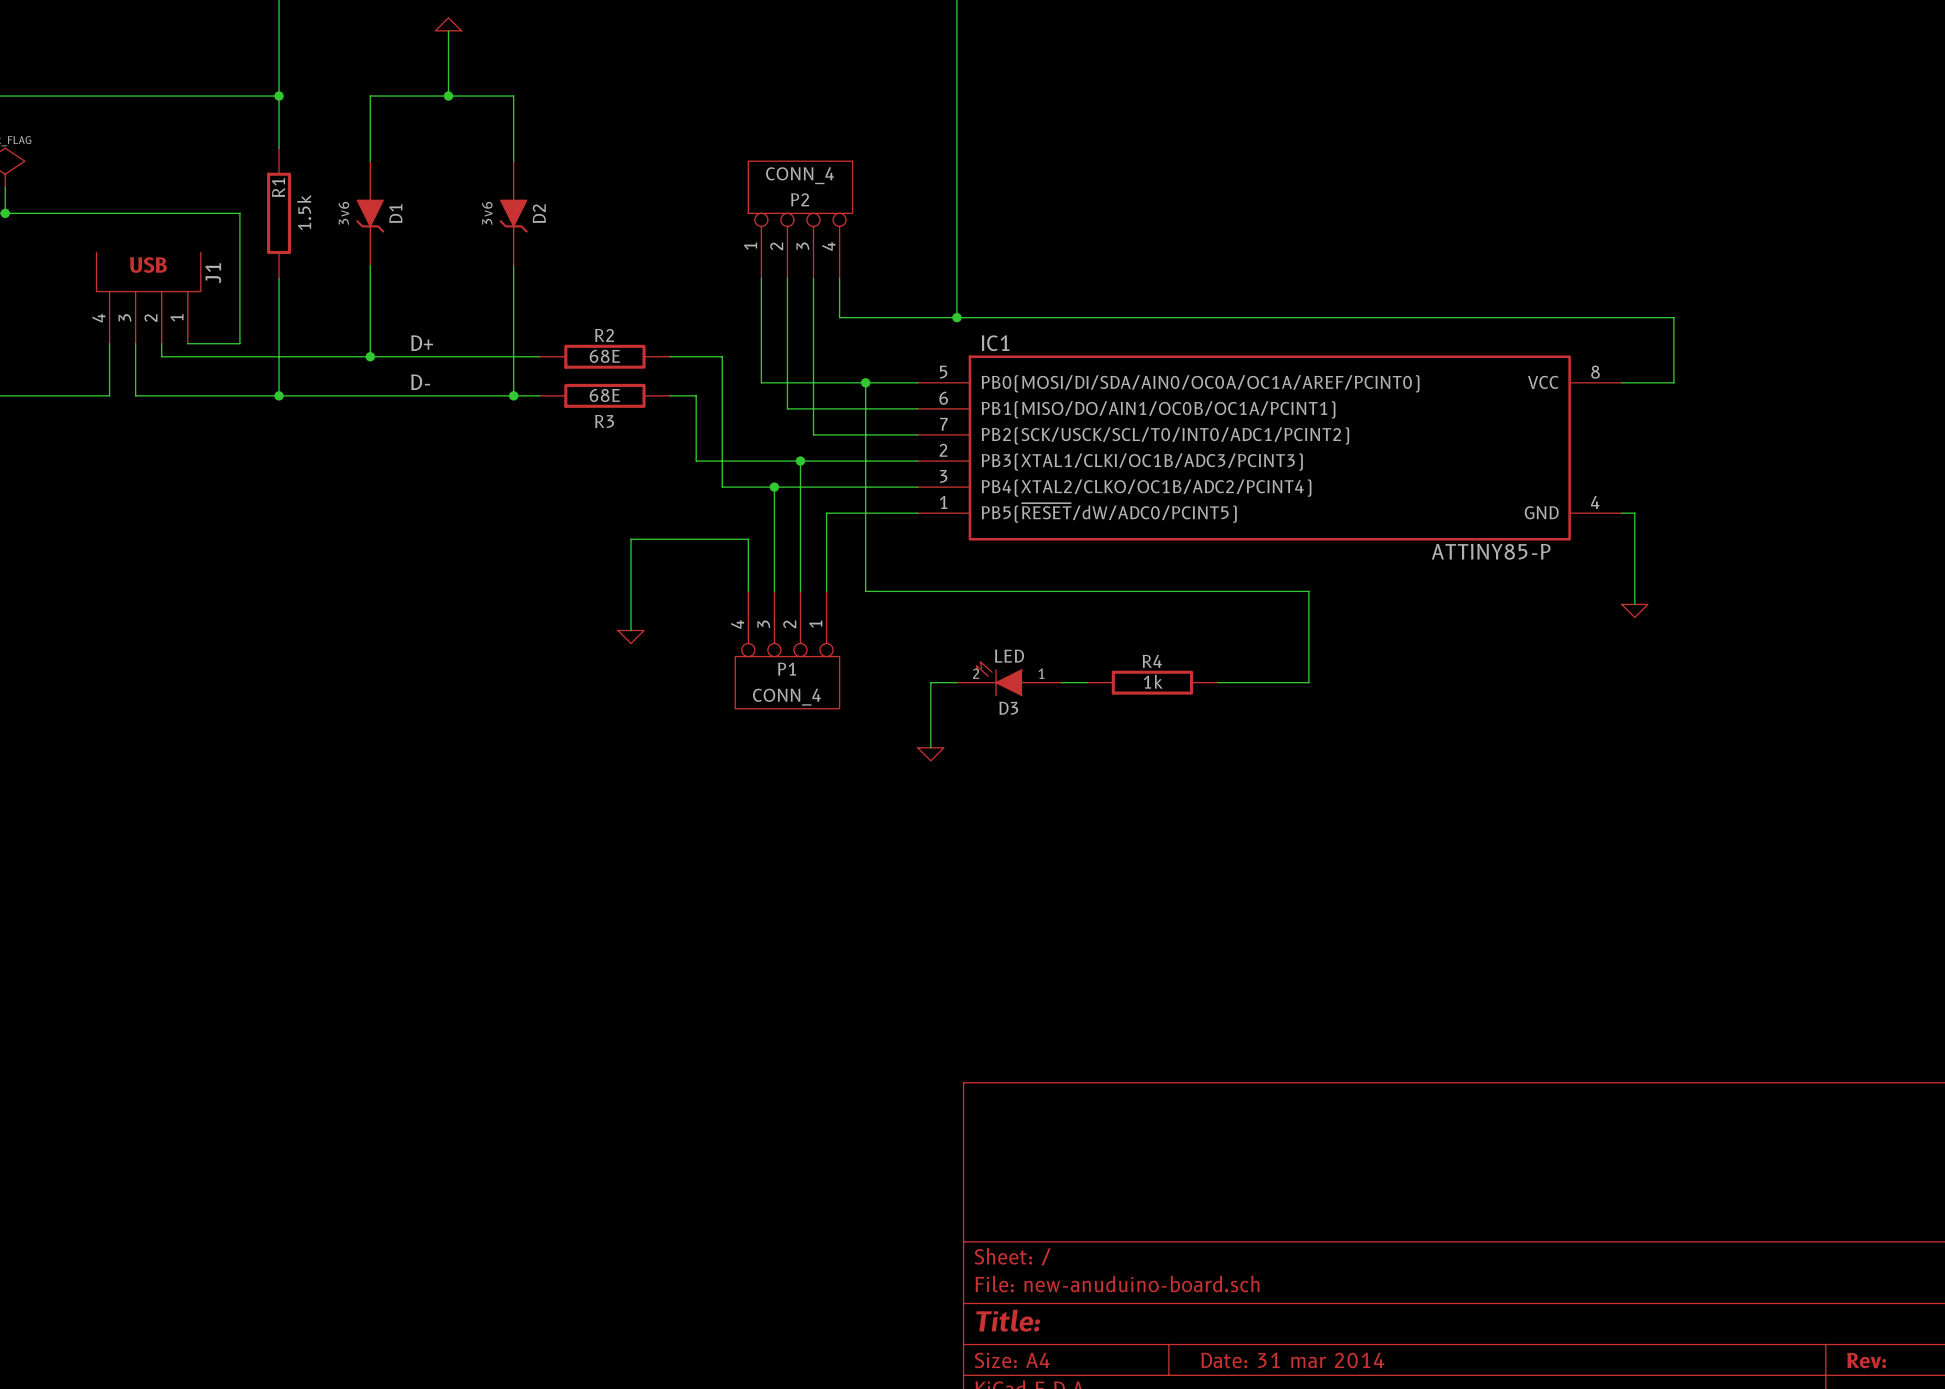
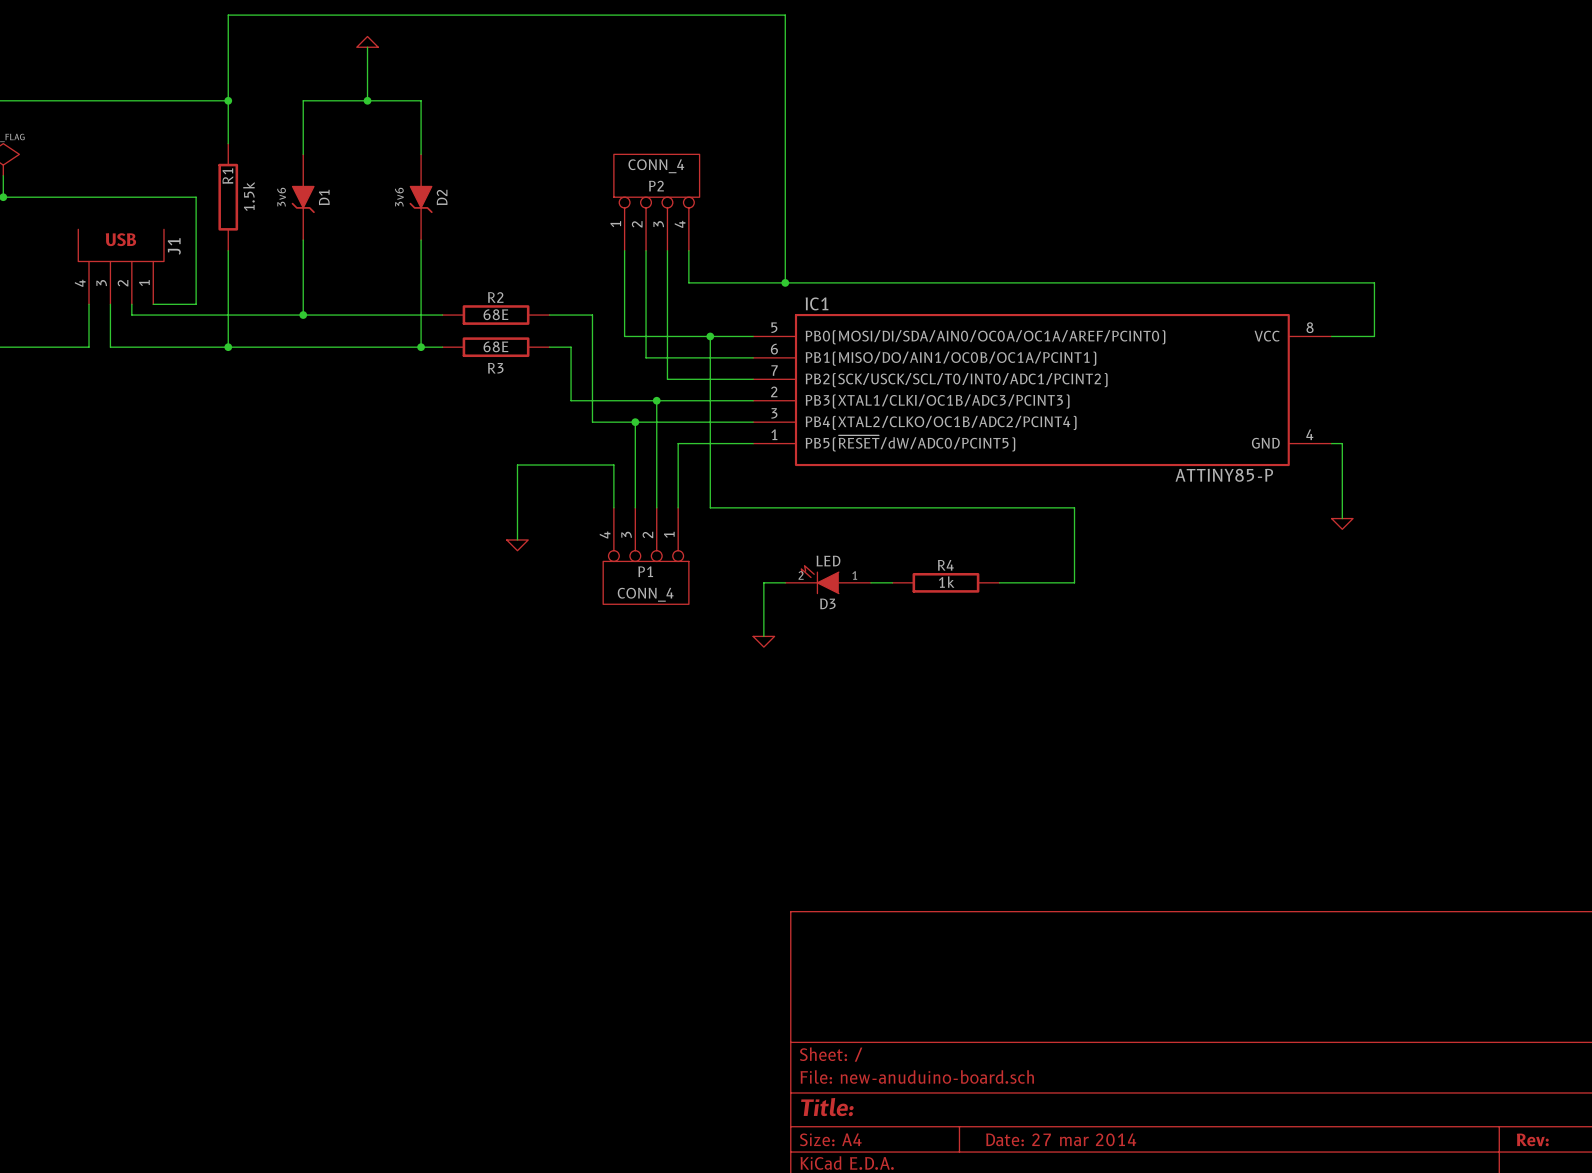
label: D+ (422, 343) -> none
label: D- (420, 382) -> none
title block: Date: 31 mar 2014 (1292, 1360) -> Date: 27 mar 2014 (1061, 1139)

